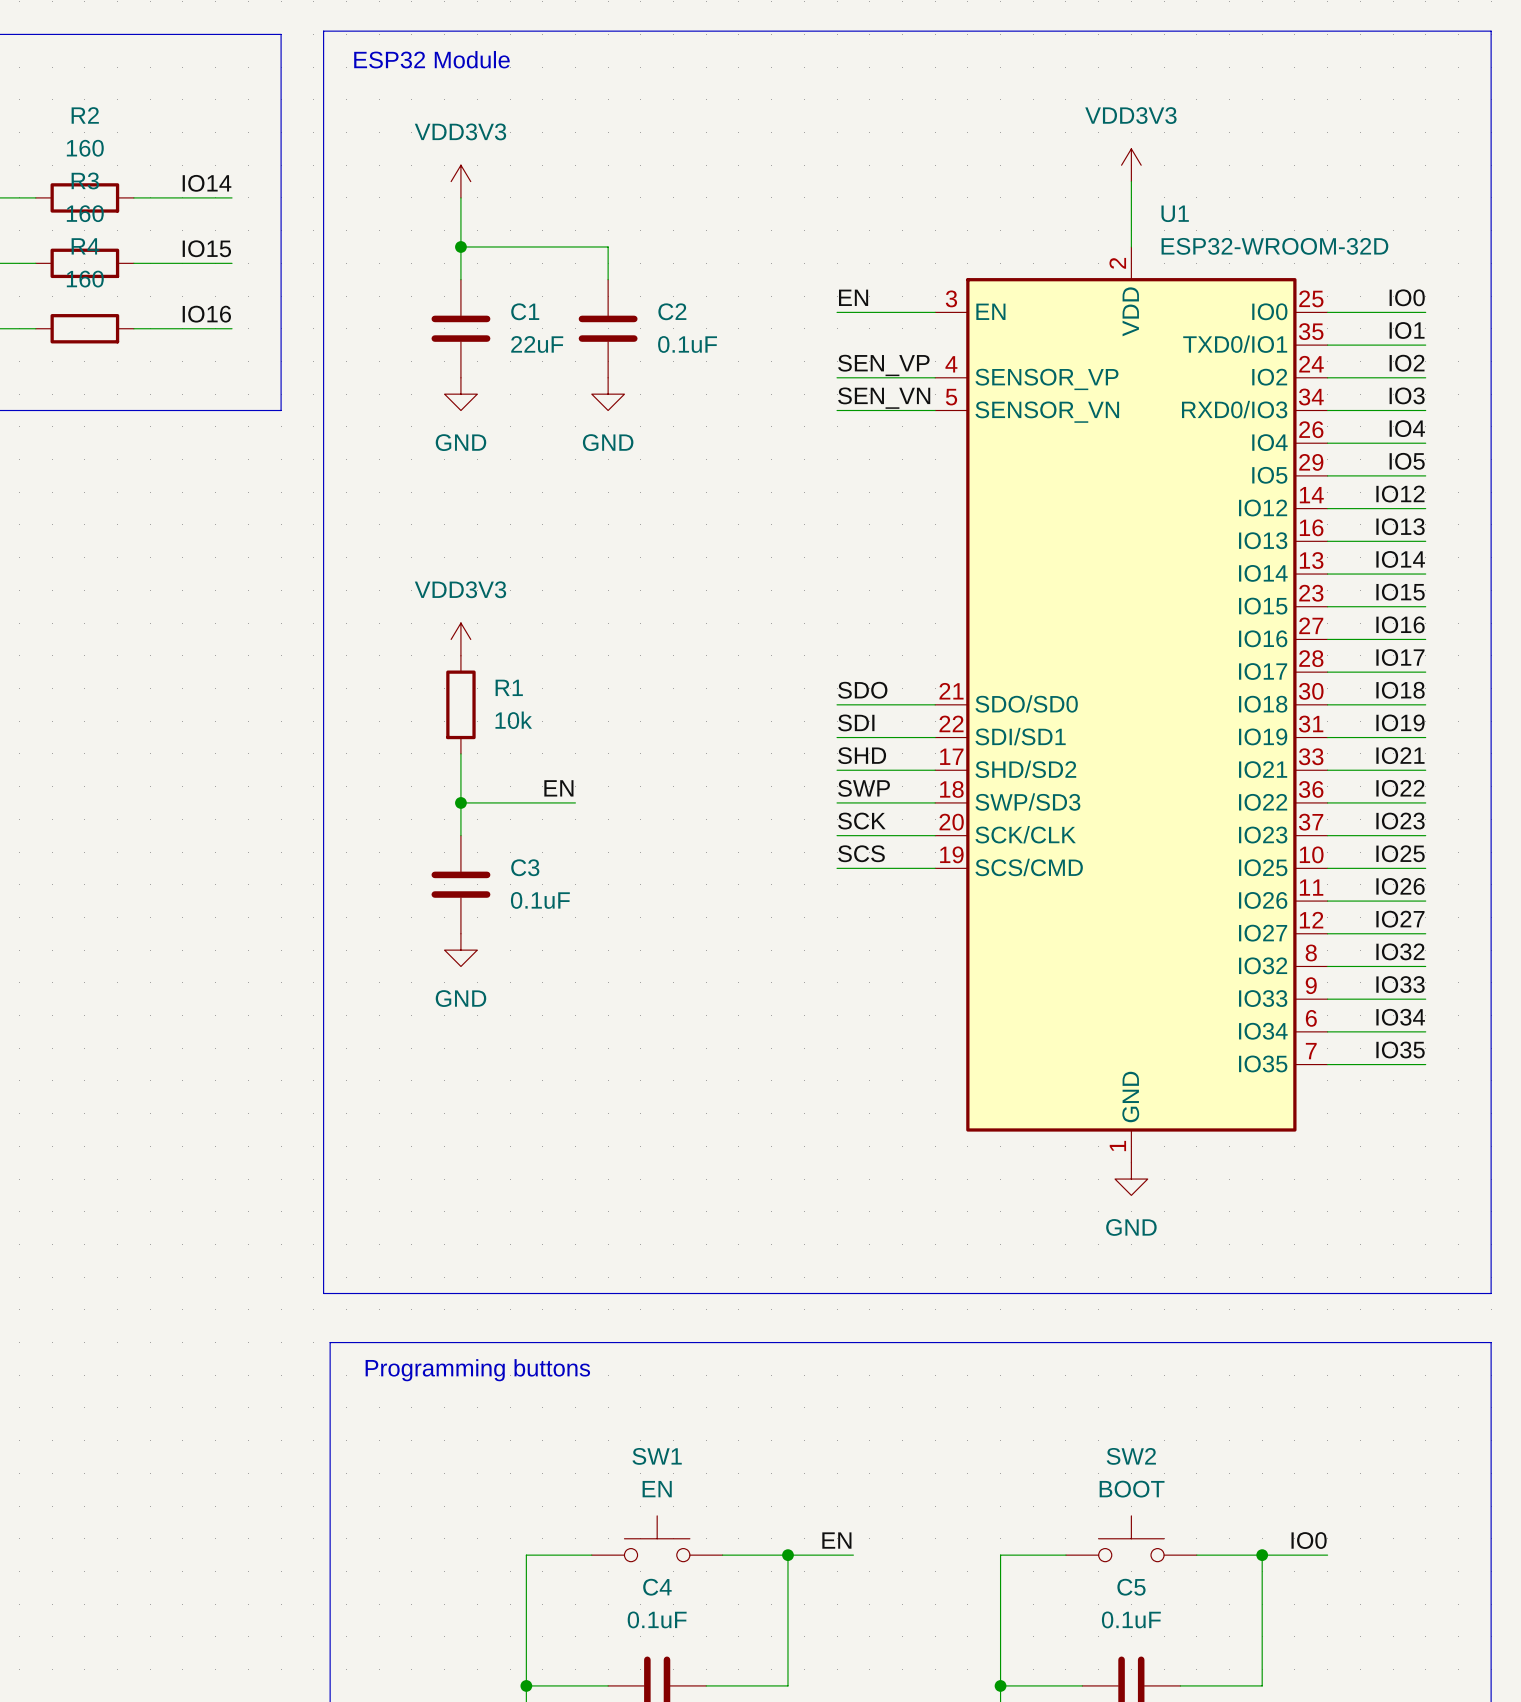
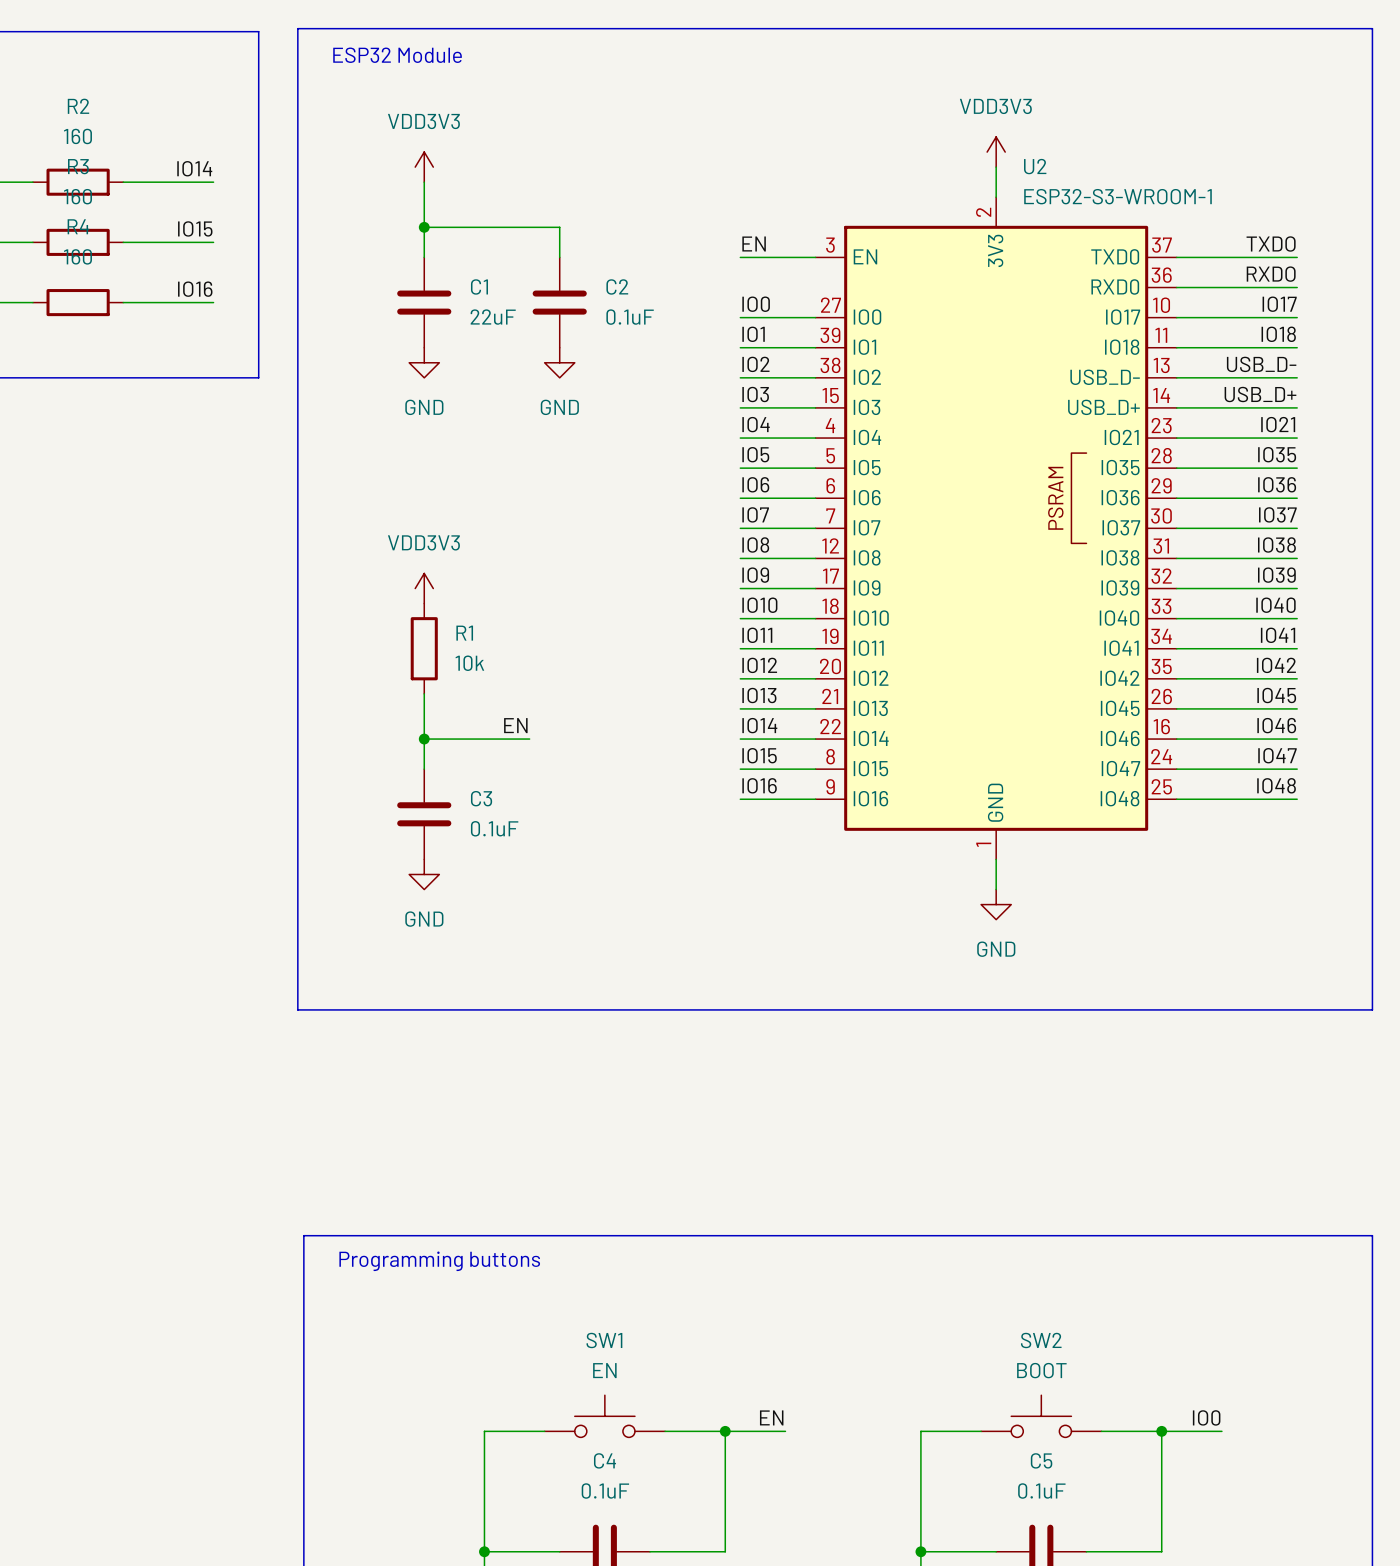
power symbol position: VDD3V3 (1131, 165) -> VDD3V3 (996, 152)
wire: none -> (996, 167) (996, 197)
wire: (1131, 181) (1131, 246) -> none
label: none -> TXDO (1271, 244)
wire: none -> (740, 257) (815, 257)
wire: none -> (1176, 257) (1297, 257)
label position: EN (853, 297) -> EN (754, 244)
label: none -> RXDO (1271, 274)
label: IO0 (1407, 297) -> none
wire: (837, 312) (935, 312) -> none
wire: (1409, 312) (1425, 312) -> none
label: none -> IO0 (756, 304)
label: IO1 (1407, 330) -> IO17 (1279, 304)
wire: none -> (740, 317) (815, 317)
wire: (1409, 345) (1425, 345) -> none
label: none -> IO1 (753, 334)
label: none -> IO18 (1278, 334)
label: IO2 (1407, 363) -> none
label: SEN_VP (883, 365) -> none
wire: none -> (740, 347) (770, 347)
wire: (1409, 377) (1425, 377) -> none
label: none -> IO2 (755, 364)
label: IO3 (1407, 395) -> none
label: SEN_VN (884, 398) -> none
label: none -> USB_D- (1261, 364)
wire: none -> (740, 377) (770, 377)
wire: (1409, 410) (1425, 410) -> none
label: none -> IO3 (755, 394)
label: IO4 (1407, 428) -> none
label: none -> USB_D+ (1260, 394)
wire: none -> (740, 407) (815, 407)
wire: (1409, 443) (1425, 443) -> none
label: none -> IO4 (756, 424)
label: IO5 (1407, 461) -> none
wire: none -> (740, 438) (815, 438)
wire: (1409, 475) (1425, 475) -> none
label: none -> IO5 (755, 454)
label: none -> IO35 (1277, 454)
label: IO12 (1400, 494) -> none
wire: none -> (740, 468) (815, 468)
wire: (1409, 508) (1425, 508) -> none
label: none -> IO6 (755, 484)
label: IO13 (1400, 526) -> IO36 (1277, 484)
wire: none -> (740, 498) (815, 498)
wire: (1409, 541) (1425, 541) -> none
label: none -> IO7 (755, 514)
label: none -> IO37 (1277, 514)
label: IO14 (1400, 559) -> none
wire: none -> (740, 528) (815, 528)
U2: none -> ESP32-S3-WROOM-1 (996, 528)
wire: (1409, 574) (1425, 574) -> none
label: none -> IO8 (755, 544)
label: none -> IO38 (1276, 544)
label: IO15 (1400, 592) -> none
wire: none -> (740, 558) (815, 558)
wire: (1409, 606) (1425, 606) -> none
label: none -> IO9 (755, 575)
label: none -> IO39 (1276, 575)
label: IO16 (1400, 624) -> none
wire: none -> (740, 588) (815, 588)
wire: (1409, 639) (1425, 639) -> none
label: none -> IO10 (759, 605)
label: none -> IO40 (1275, 605)
label: IO17 (1400, 657) -> none
wire: none -> (740, 618) (815, 618)
wire: (1409, 672) (1425, 672) -> none
label: none -> IO11 (757, 635)
label: SDO (862, 690) -> none
label: IO18 (1400, 690) -> IO41 (1278, 635)
wire: none -> (740, 648) (770, 648)
U1: ESP32-WROOM-32D (1131, 704) -> none
wire: (1409, 704) (1425, 704) -> none
label: none -> IO12 (759, 665)
label: SDI (856, 722) -> none
label: none -> IO42 (1276, 665)
label: IO19 (1400, 722) -> none
wire: none -> (740, 678) (770, 678)
wire: (1409, 737) (1425, 737) -> none
label: none -> IO13 (759, 695)
label: SHD (862, 755) -> none
label: none -> IO45 (1276, 695)
label position: IO21 (1400, 755) -> IO21 (1278, 424)
wire: none -> (740, 708) (770, 708)
wire: (1409, 770) (1425, 770) -> none
label: none -> IO14 (759, 725)
label: SWP (864, 788) -> none
label: none -> IO46 (1276, 725)
label: IO22 (1400, 788) -> none
wire: none -> (740, 739) (770, 739)
wire: (1409, 802) (1425, 802) -> none
label: none -> IO15 (759, 755)
label: SCK (861, 821) -> none
label: none -> IO47 (1277, 755)
label: IO23 (1400, 821) -> none
wire: none -> (740, 769) (770, 769)
wire: (1409, 835) (1425, 835) -> none
label: none -> IO16 (759, 785)
label: SCS (861, 853) -> none
label: none -> IO48 (1276, 785)
label: IO25 (1400, 853) -> none
wire: none -> (740, 799) (770, 799)
wire: (1409, 868) (1425, 868) -> none
label: IO26 (1400, 886) -> none
wire: (1327, 901) (1425, 901) -> none
label: IO27 (1400, 919) -> none
wire: (1327, 933) (1425, 933) -> none
label: IO32 (1400, 951) -> none
wire: (1327, 966) (1425, 966) -> none
label: IO33 (1400, 984) -> none
wire: (1327, 999) (1425, 999) -> none
label: IO34 (1400, 1017) -> none
wire: (1327, 1031) (1425, 1031) -> none
label: IO35 (1400, 1049) -> none
wire: (1327, 1064) (1425, 1064) -> none
line: (323, 1097) (323, 1293) (1491, 1293) (1491, 1097) -> (297, 1009) (1372, 1009)
power symbol position: GND (1131, 1179) -> GND (996, 904)

